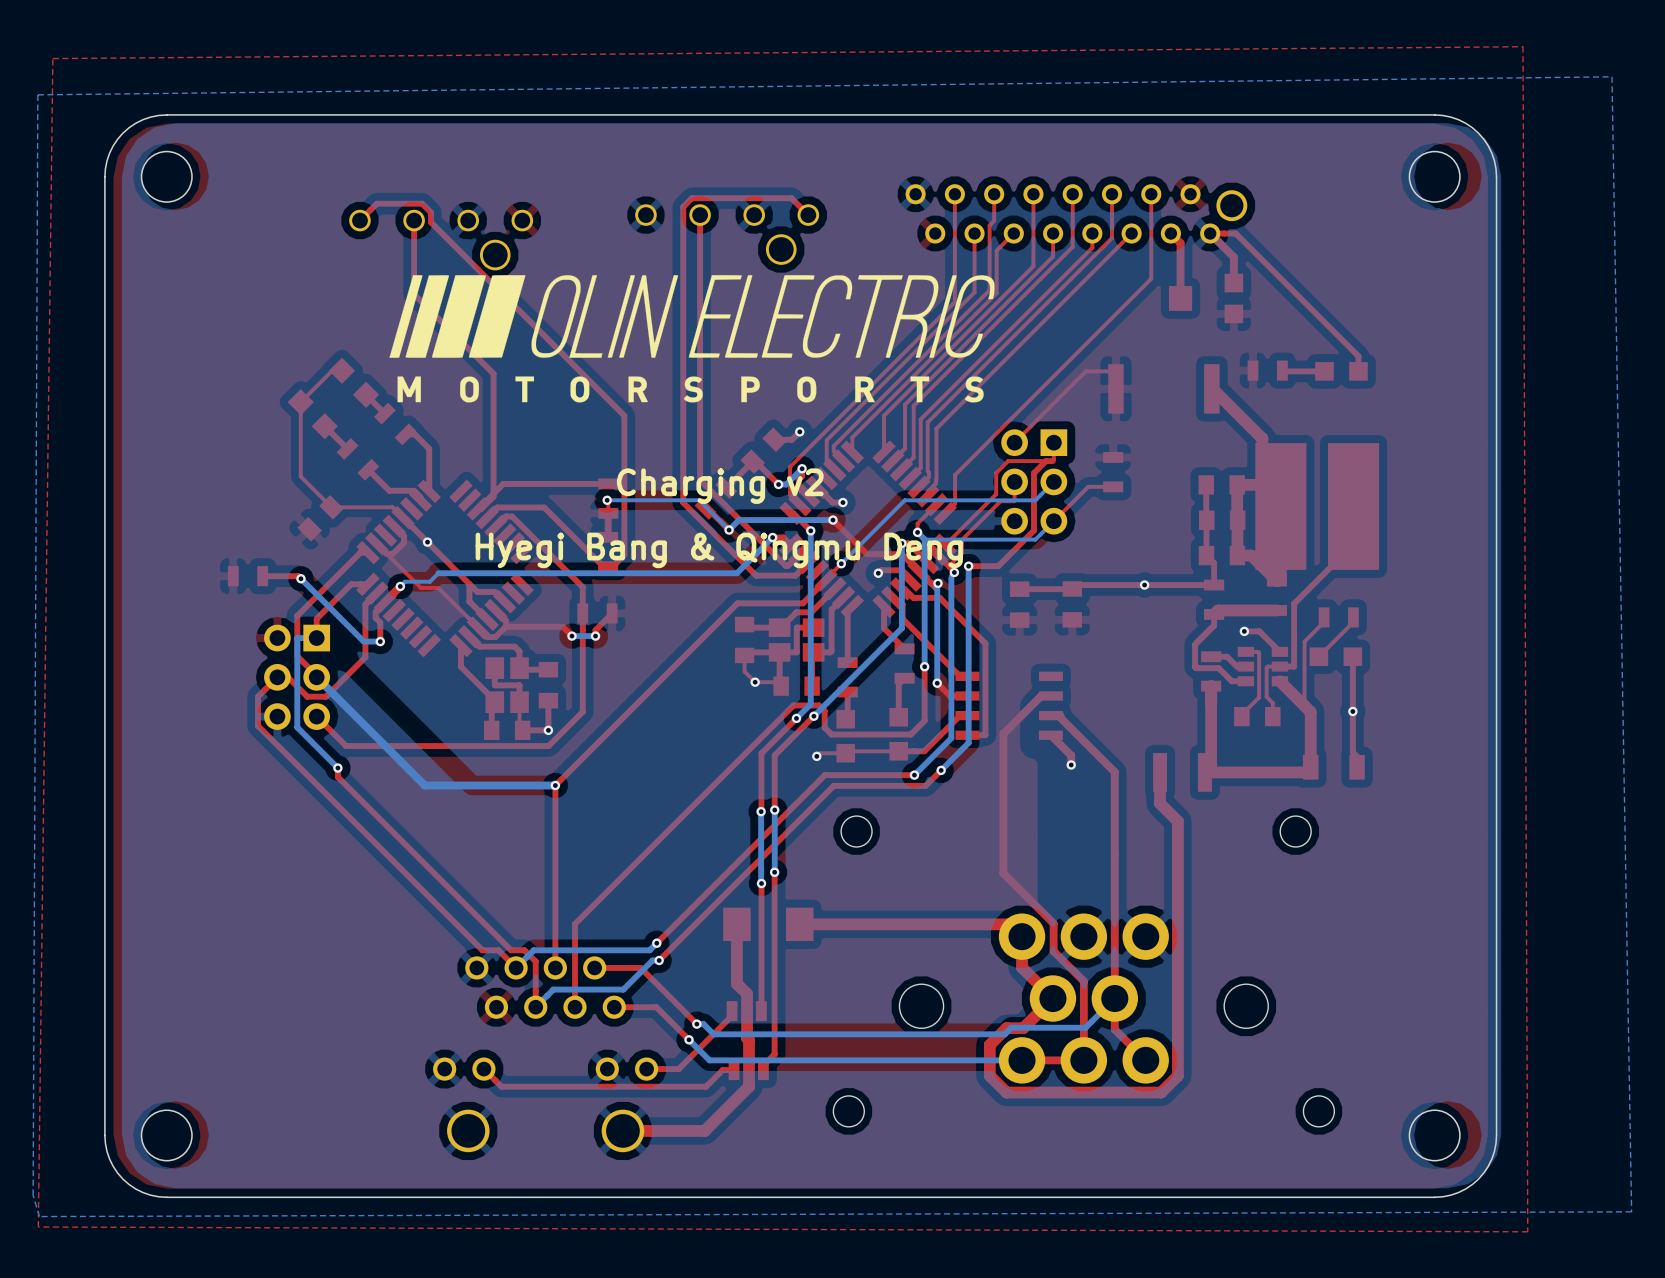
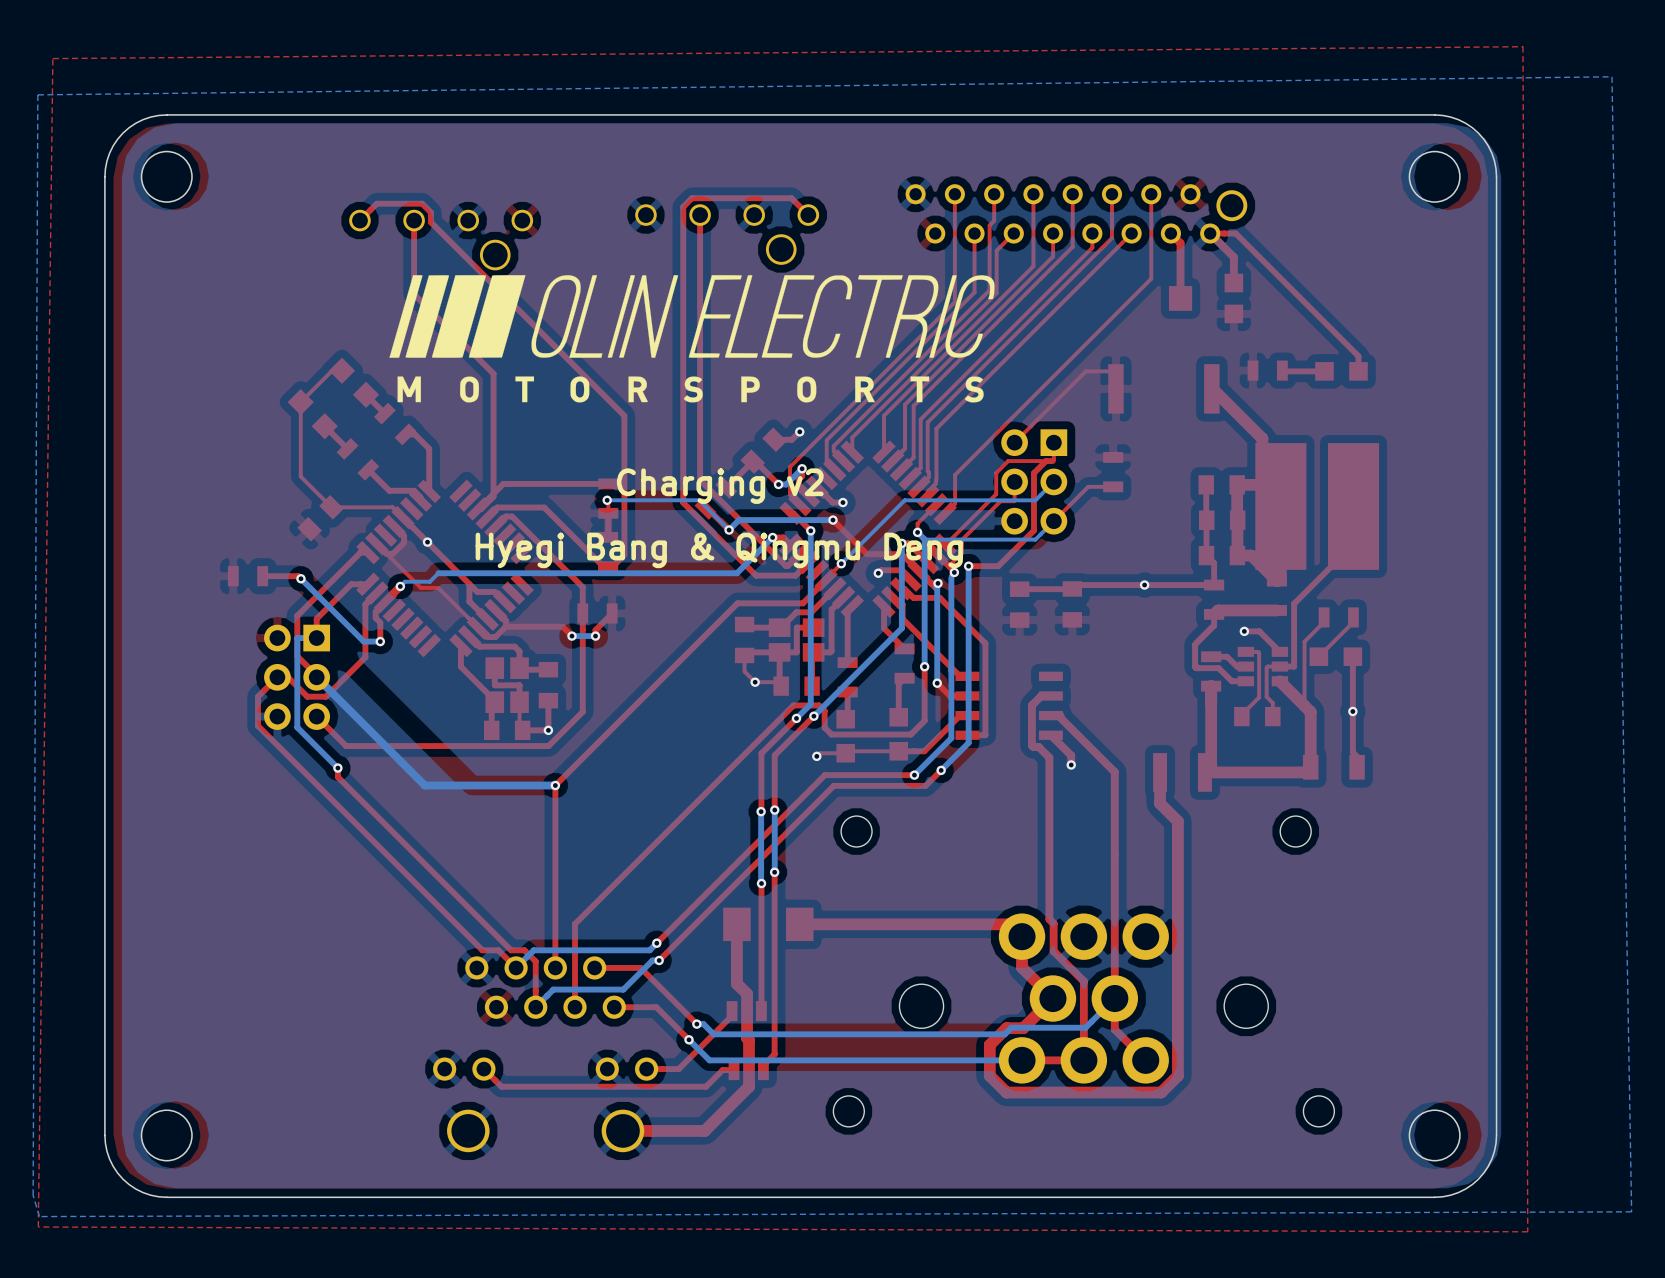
top track: (1031, 705) (1003, 733) (1003, 873) (1049, 919) -> (1031, 705) (1031, 745) (1038, 746) (1049, 757) (1049, 919)

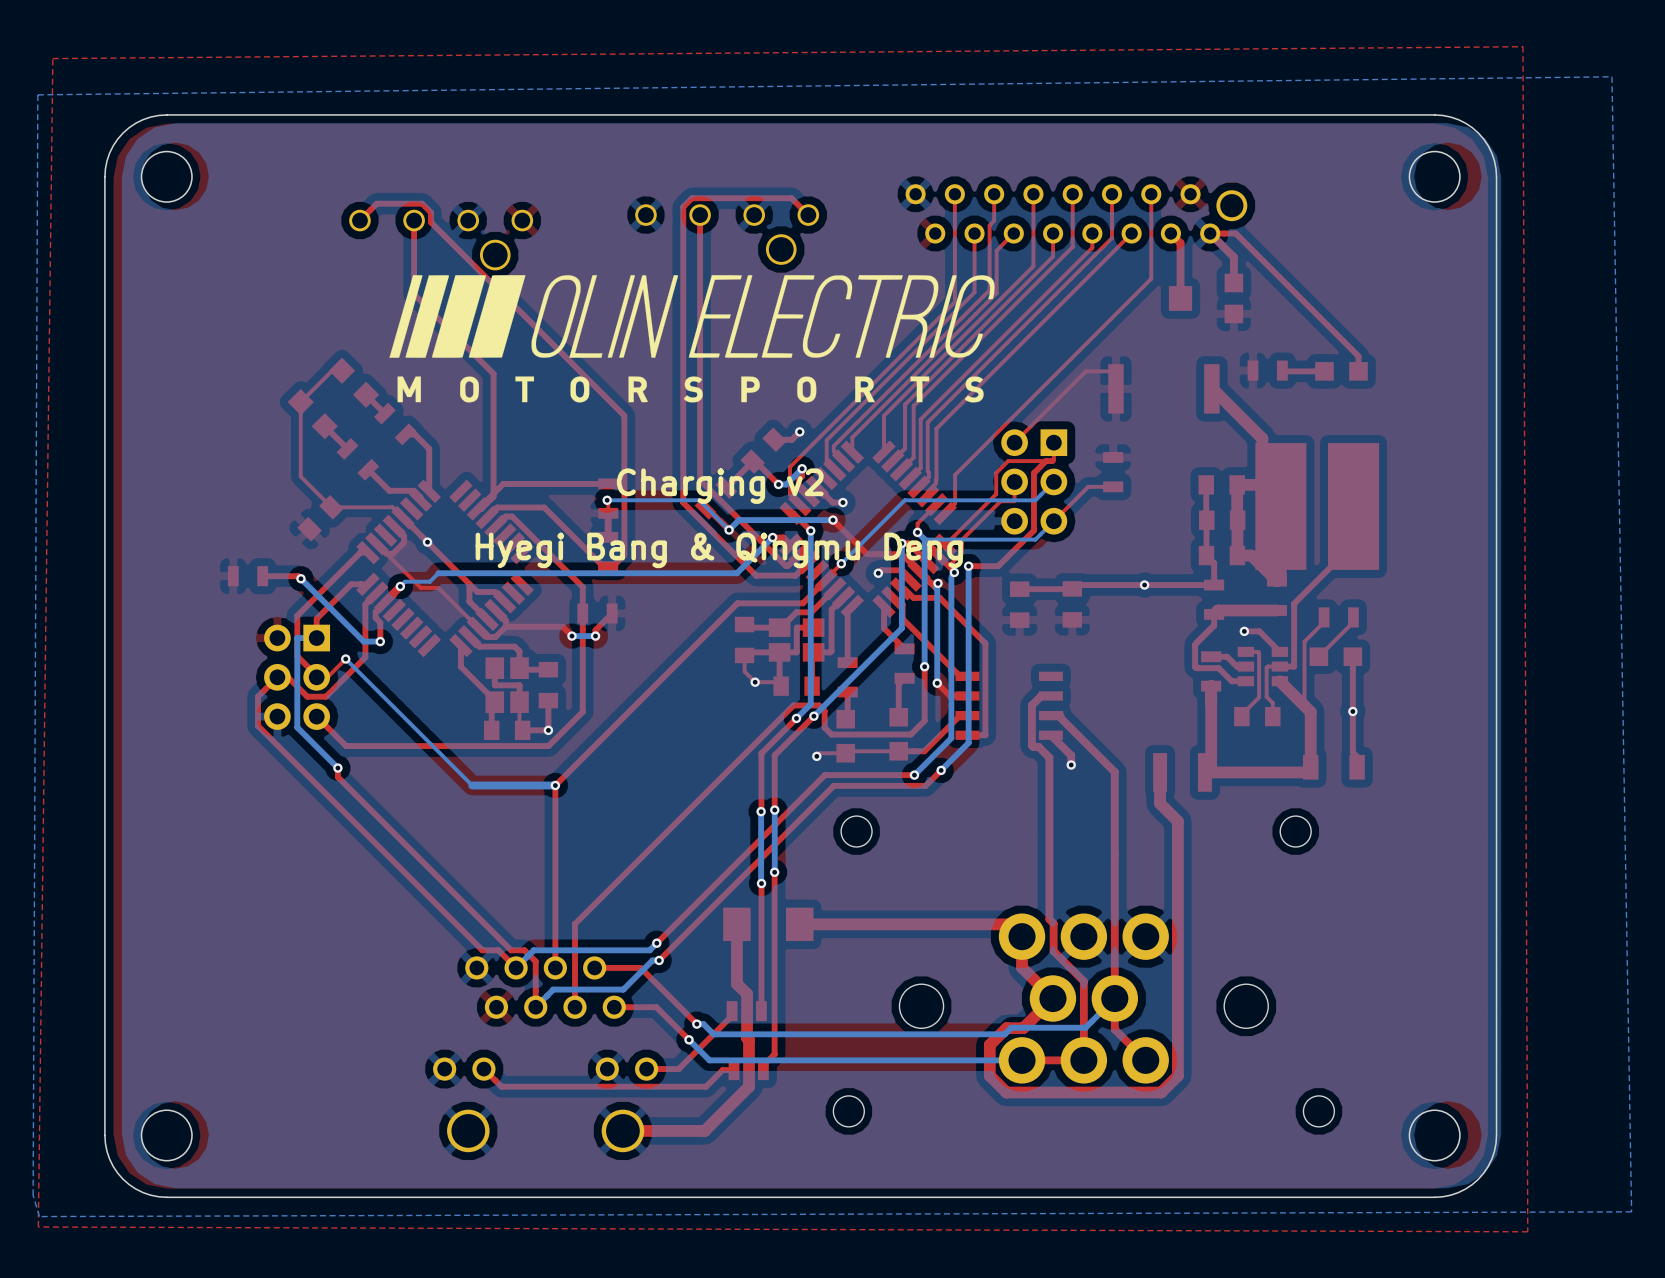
top track: none -> (345, 659) (327, 677)
via: none -> (345, 659)
bottom track: (316, 677) (424, 785) (472, 785) -> (345, 659) (472, 785)

